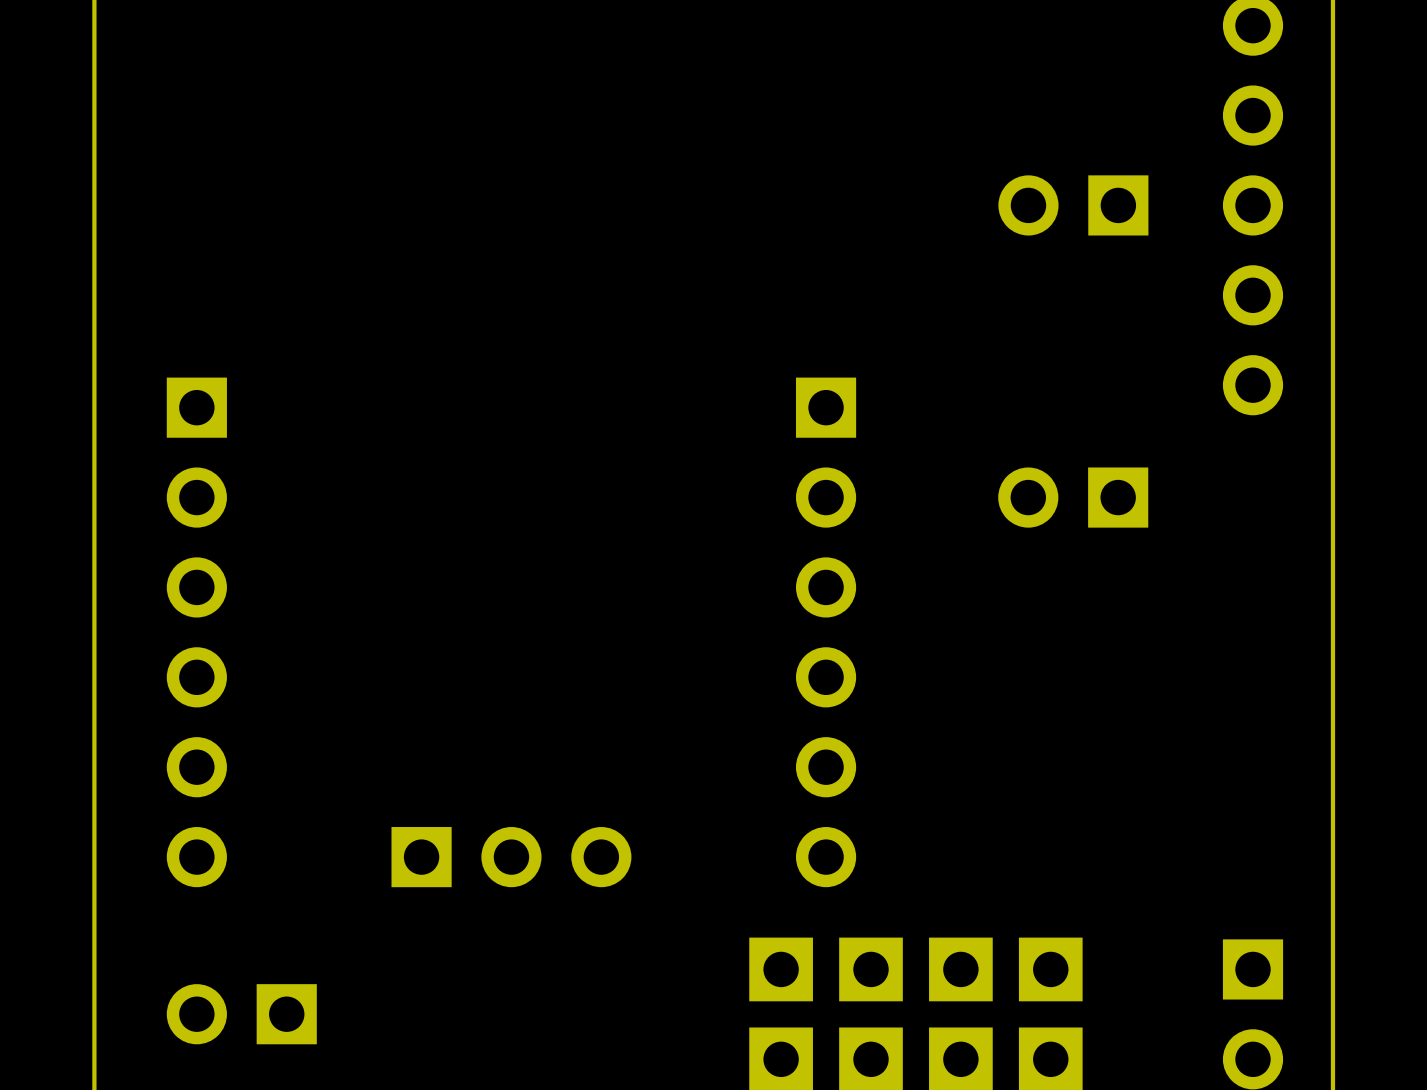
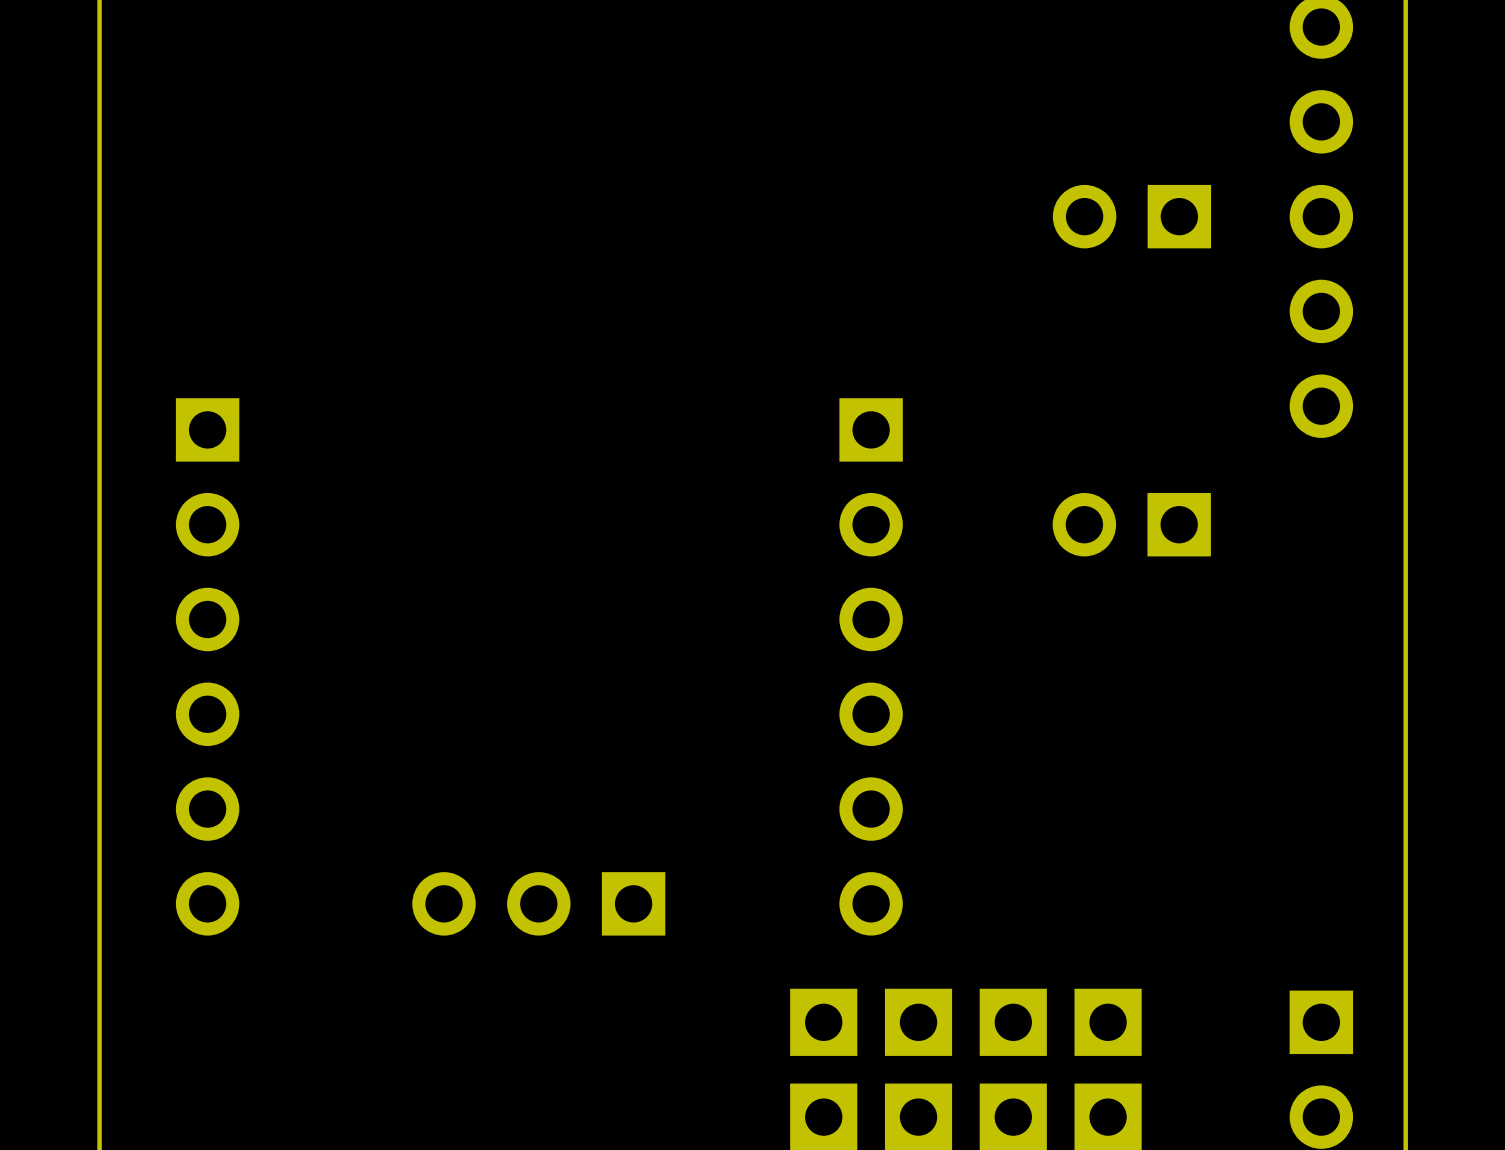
part rotation: 0° (511, 857) -> 180° (538, 903)
part: (241, 1014) -> none

